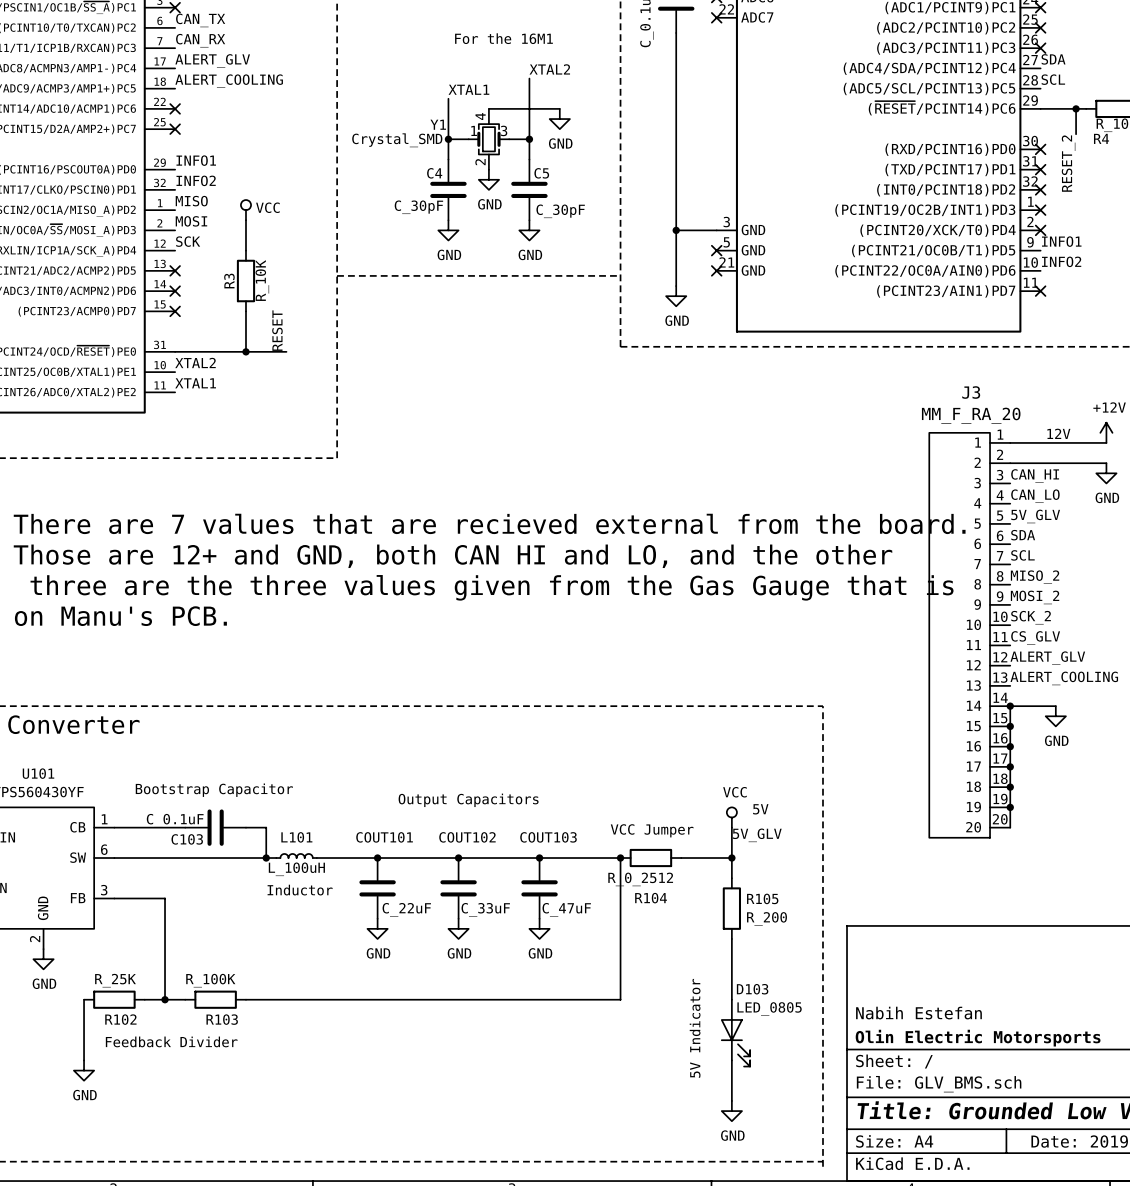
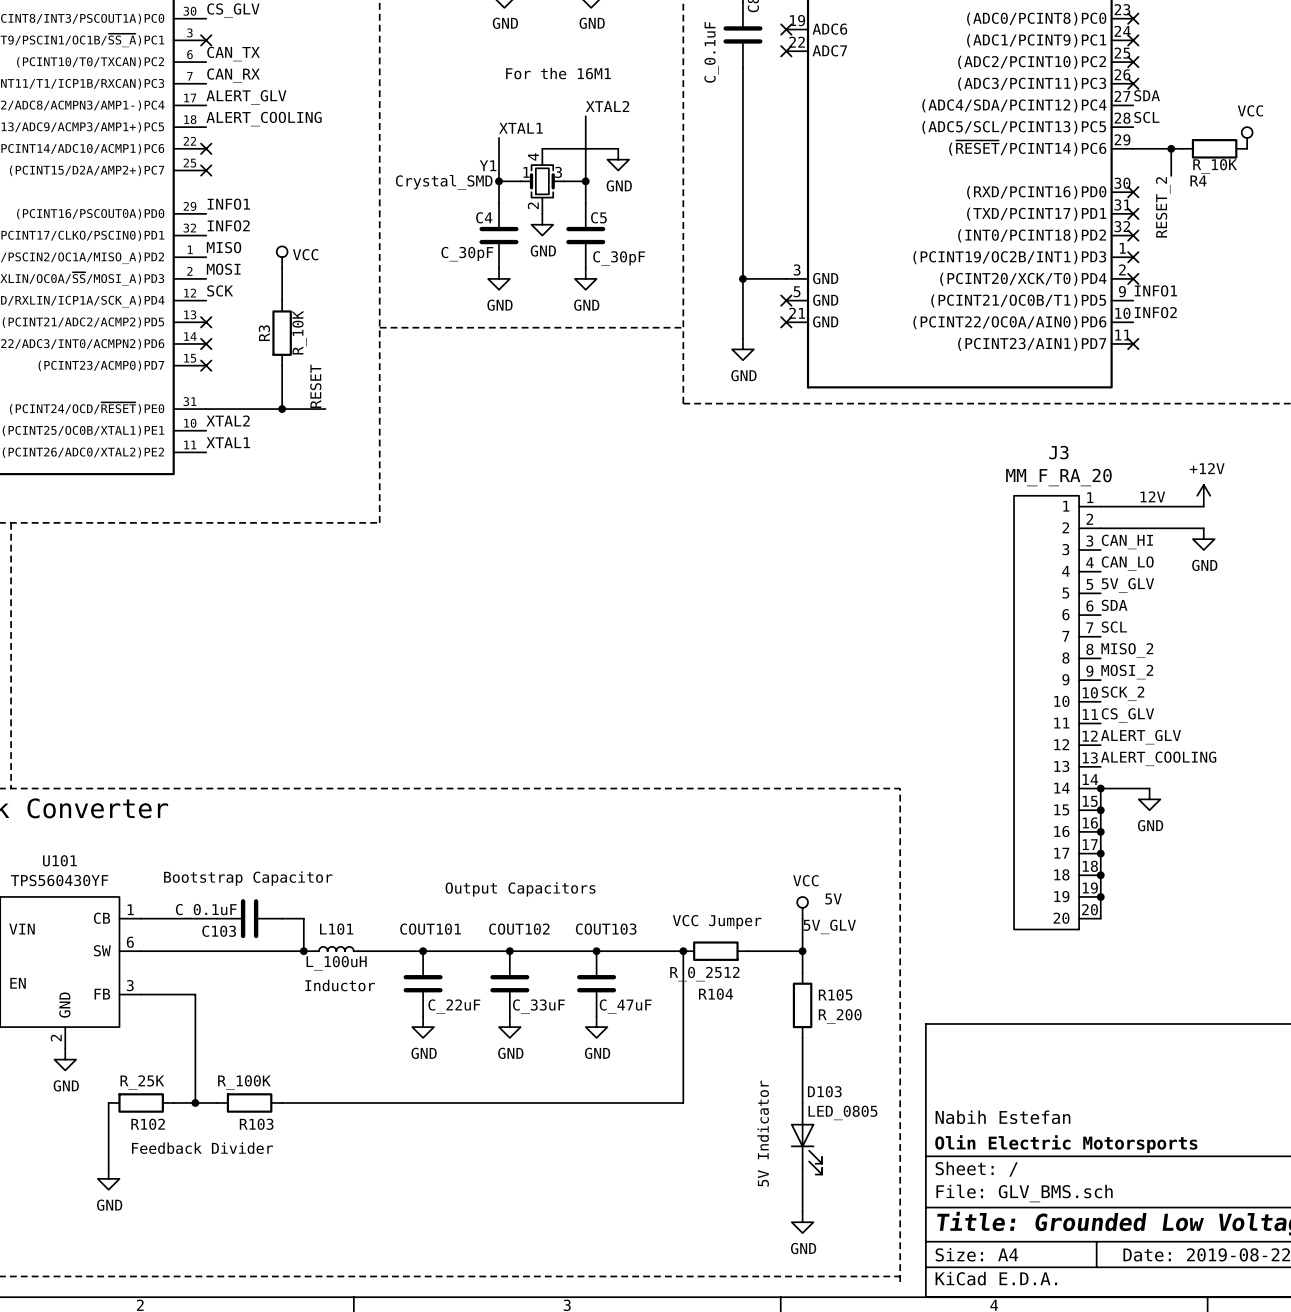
text: There are 7 values that are recieved external from the board. (489, 523) -> none
text: Those are 12+ and GND, both CAN HI and LO, and the other (453, 556) -> none
text: three are the three values given from the Gas Gauge that is (492, 587) -> none
text: on Manu's PCB. (120, 616) -> none

